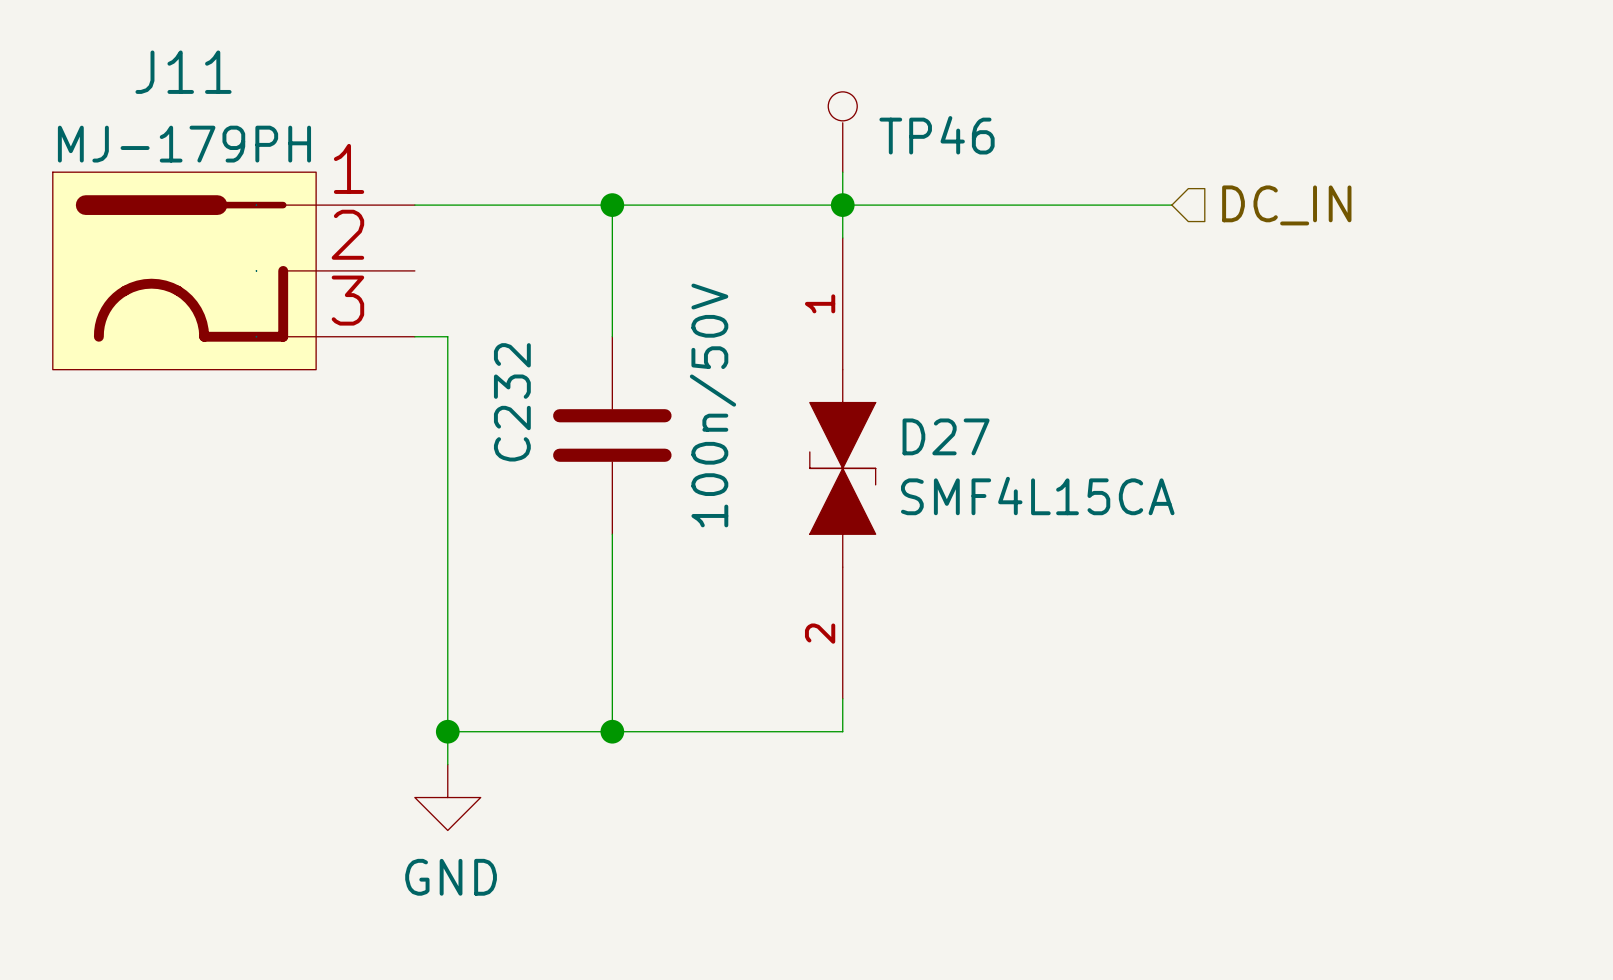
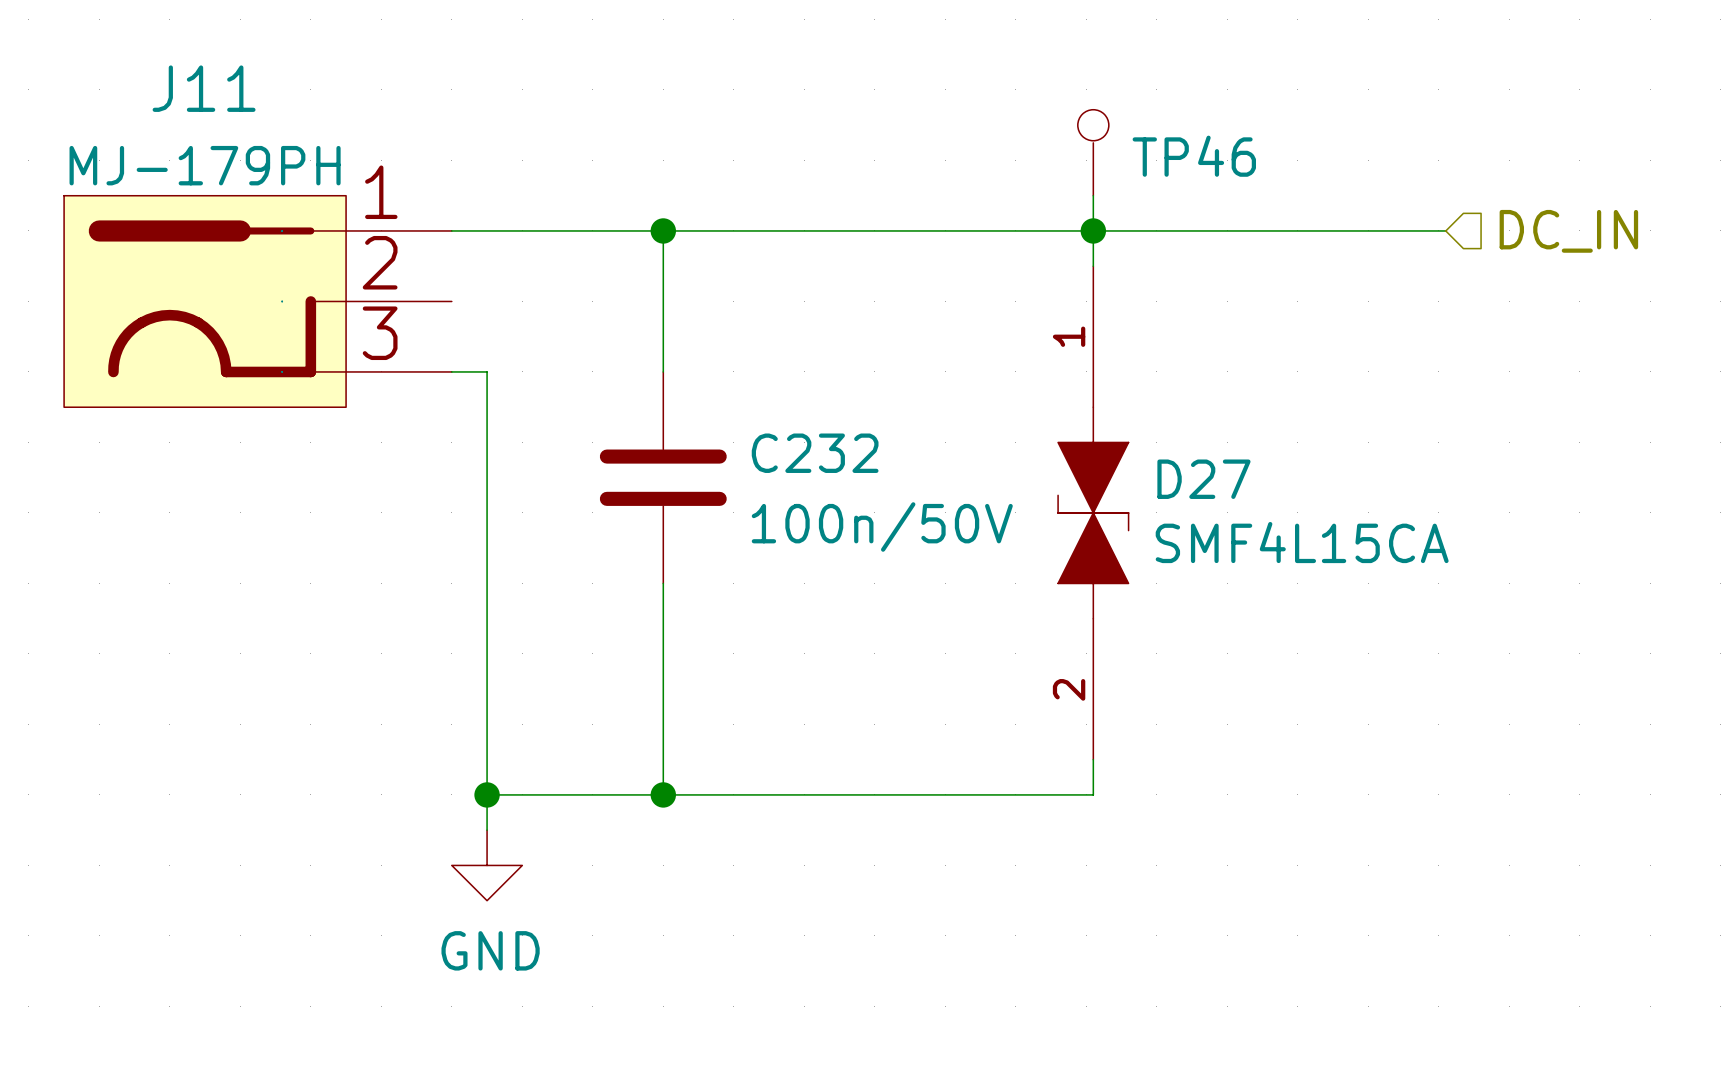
TP46 position: (842, 132) -> (1093, 152)
wire: (842, 172) (842, 238) -> (1093, 195) (1093, 266)
junction: (842, 205) -> none
junction: none -> (1093, 230)
wire: none -> (1262, 230) (1445, 230)
hierarchical label position: DC_IN (1286, 205) -> DC_IN (1568, 231)
C232 name rotation: 0° (512, 402) -> 90° clockwise (815, 453)
C232 name position: C232 (512, 402) -> C232 (815, 453)
C232 text rotation: 0° (712, 405) -> 90° clockwise (882, 527)
D27 position: (842, 468) -> (1093, 512)
wire: (842, 698) (842, 731) -> (1093, 759) (1093, 794) (910, 794)

